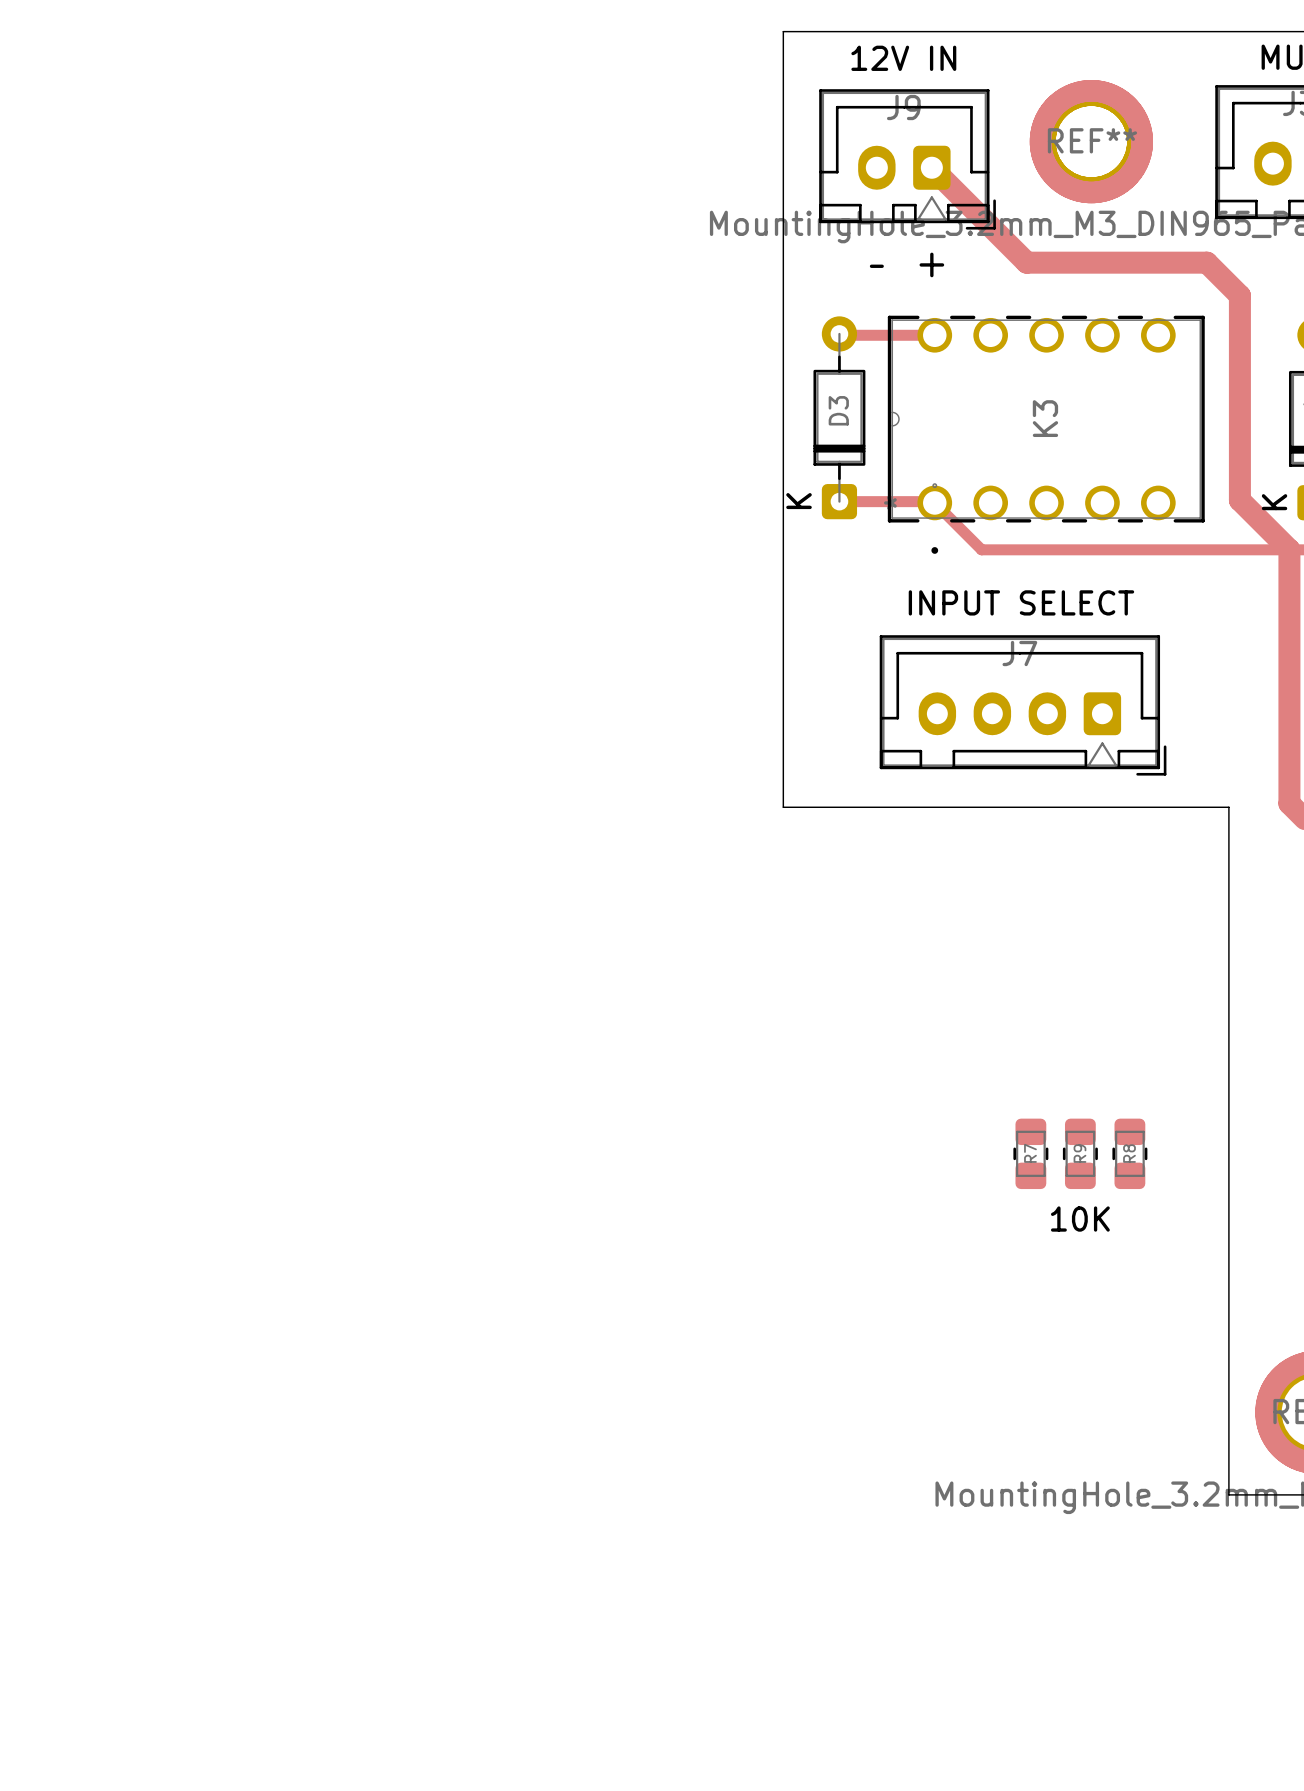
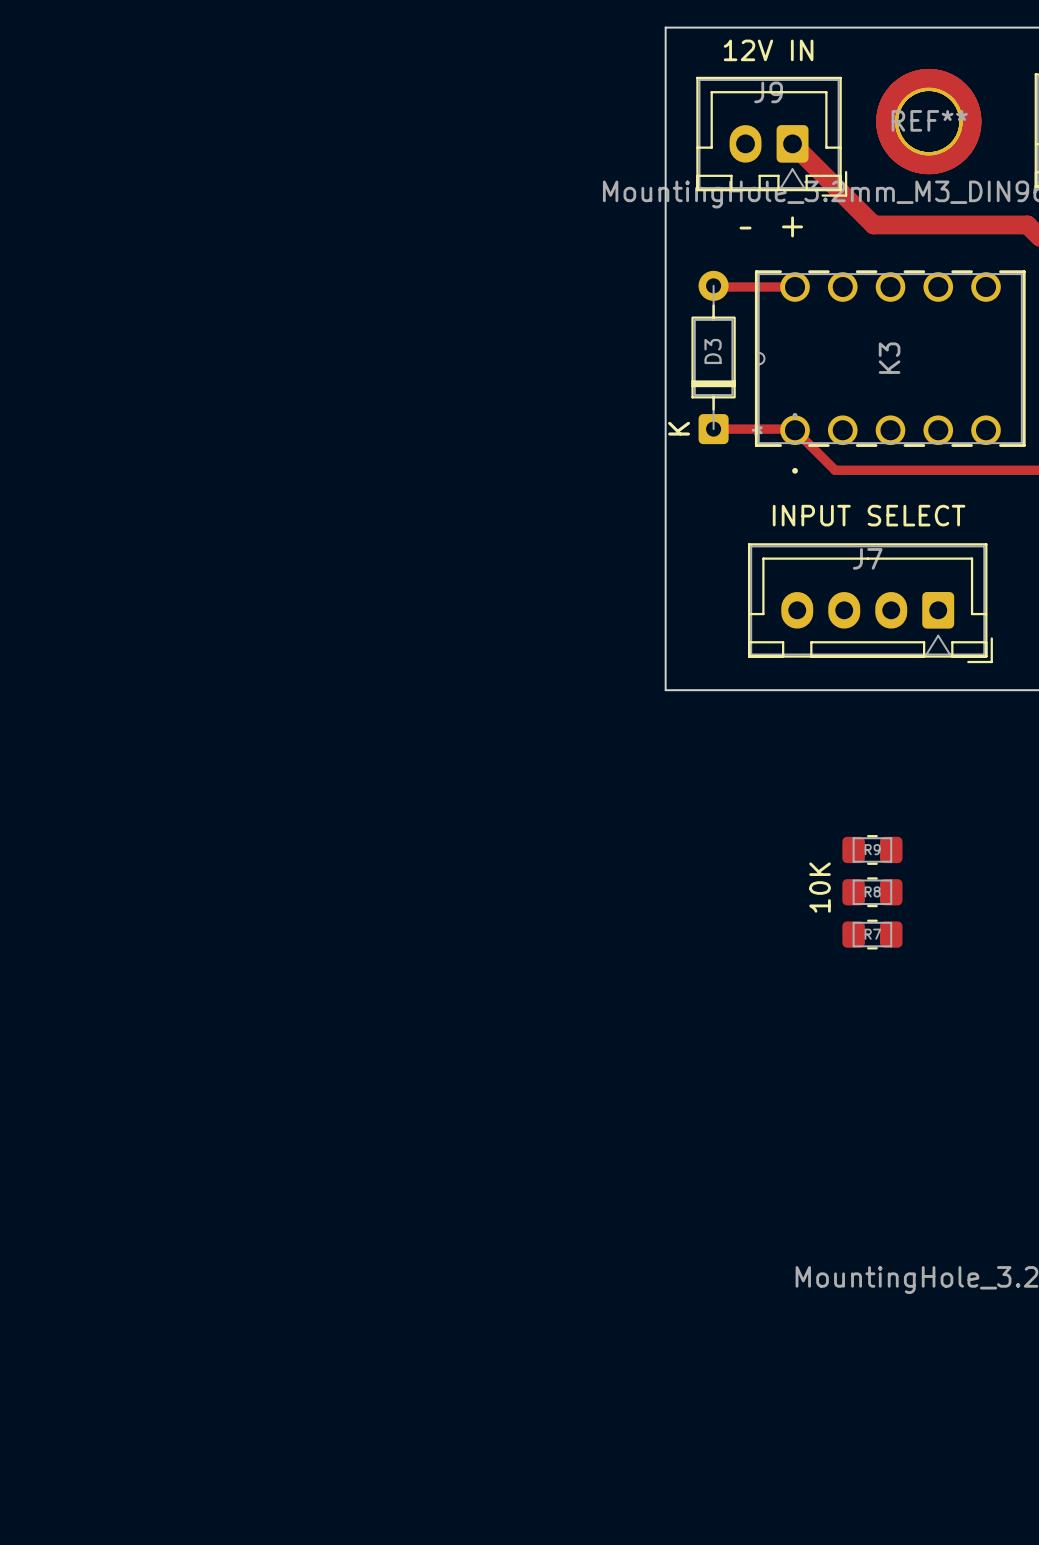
R7 rotation: 0° (1030, 1153) -> 90° clockwise (872, 934)
R7 position: (1030, 1153) -> (872, 934)
R9 rotation: 0° (1080, 1153) -> 90° clockwise (872, 849)
R9 position: (1080, 1153) -> (872, 849)
R8 rotation: 0° (1129, 1153) -> 90° clockwise (872, 892)
R8 position: (1129, 1153) -> (872, 892)
R9 value position: 10K (1080, 1219) -> 10K (820, 887)

